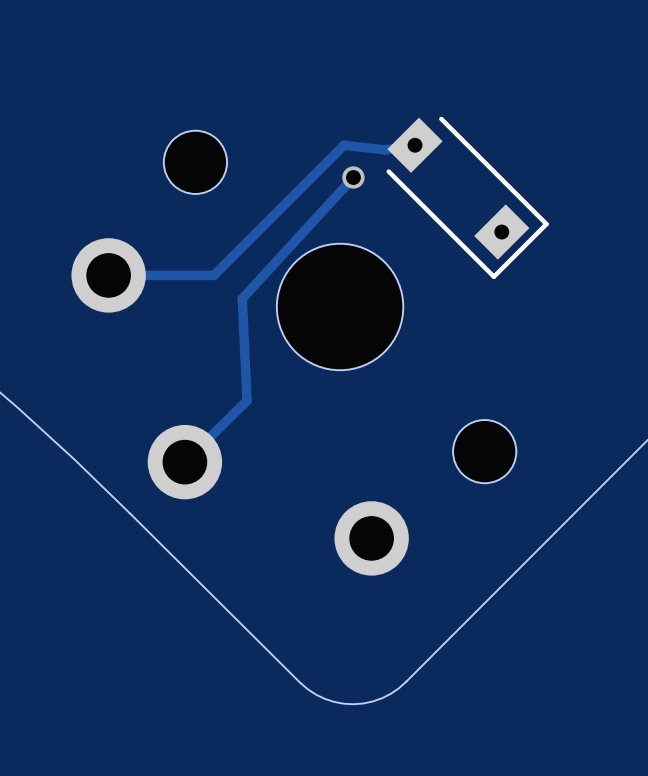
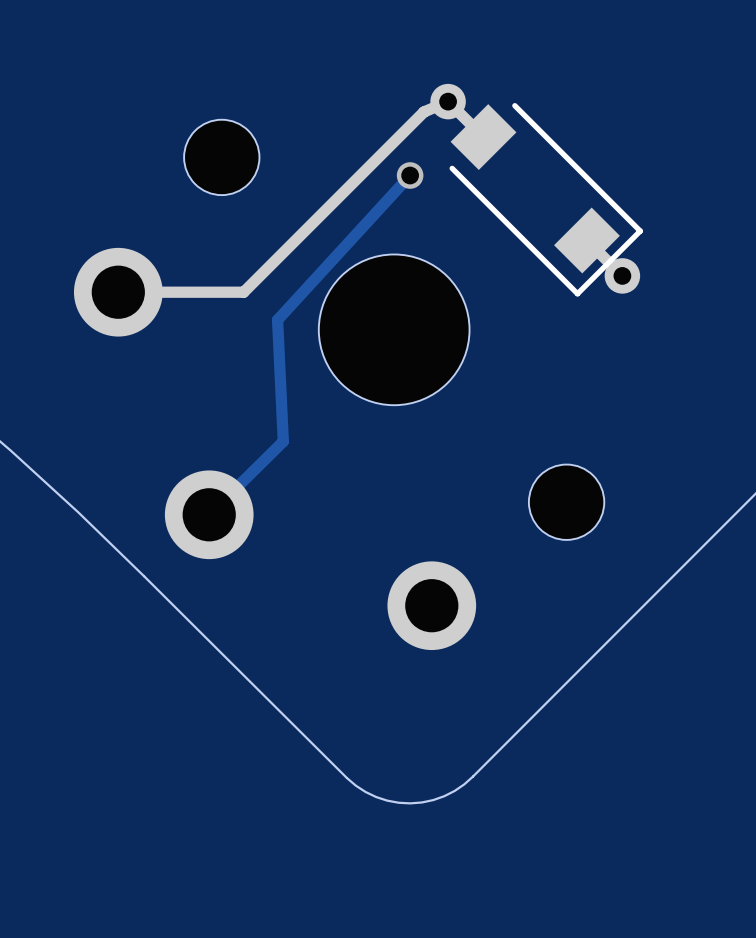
part footprint: [71, 116, 549, 576] -> [73, 83, 643, 651]

